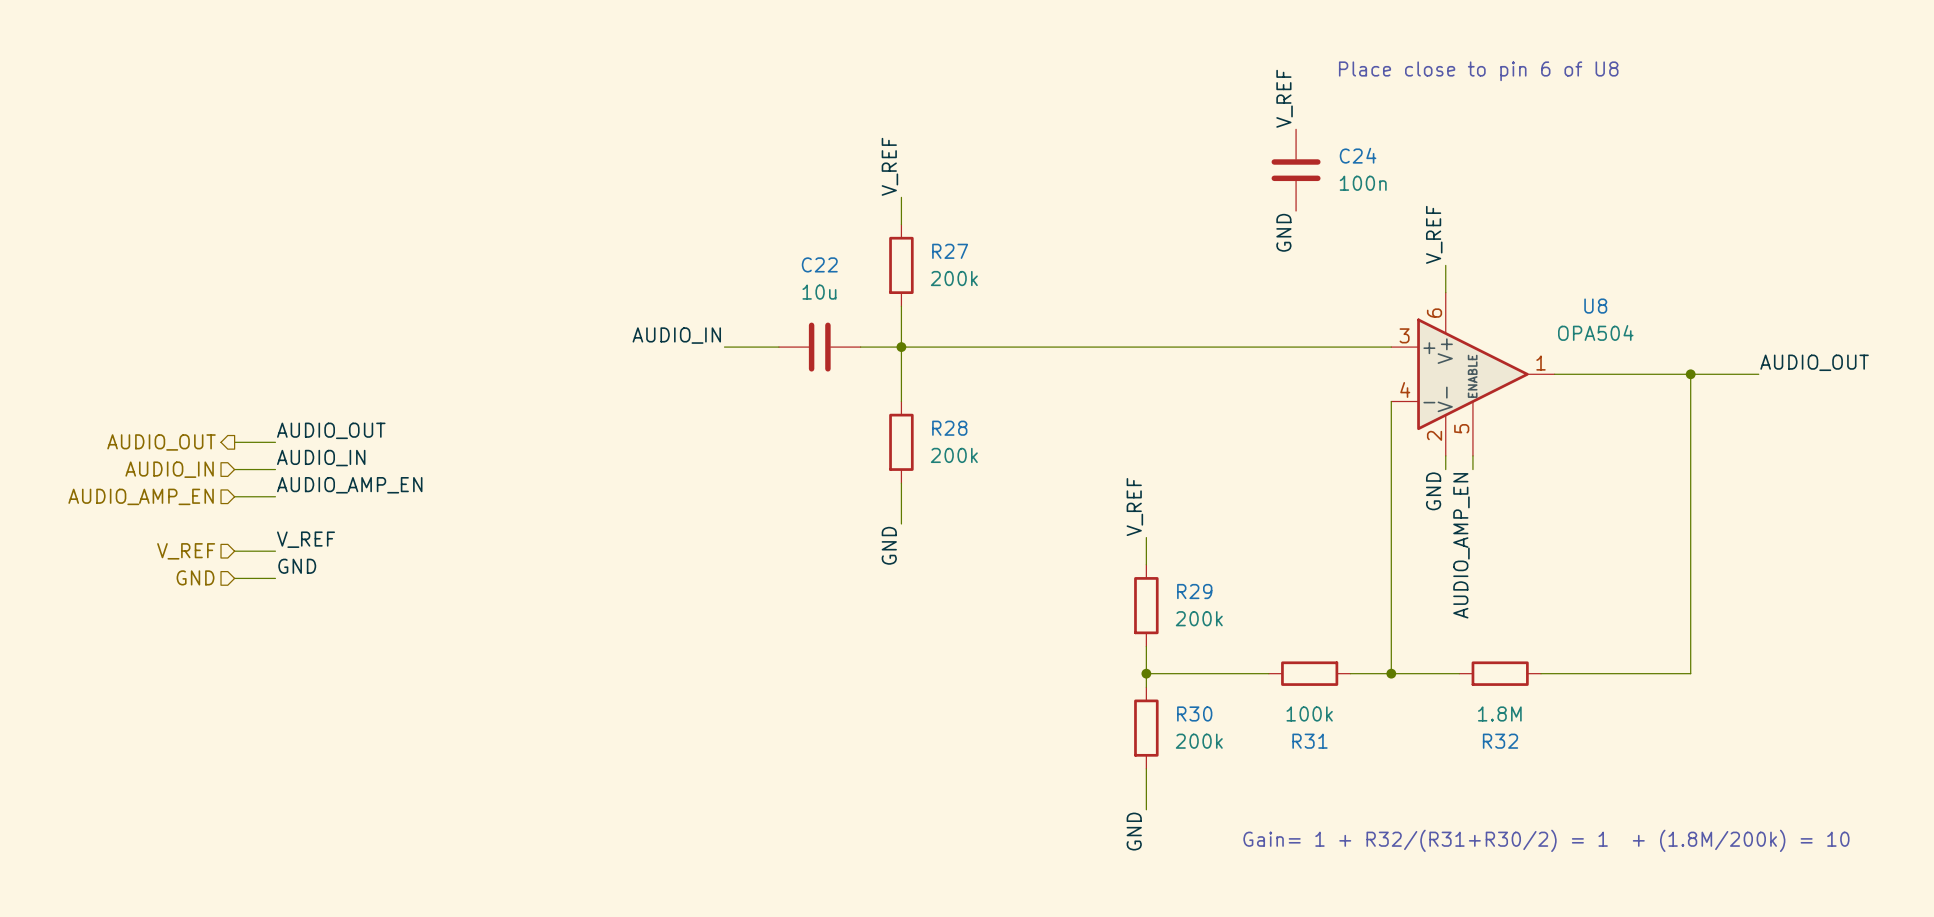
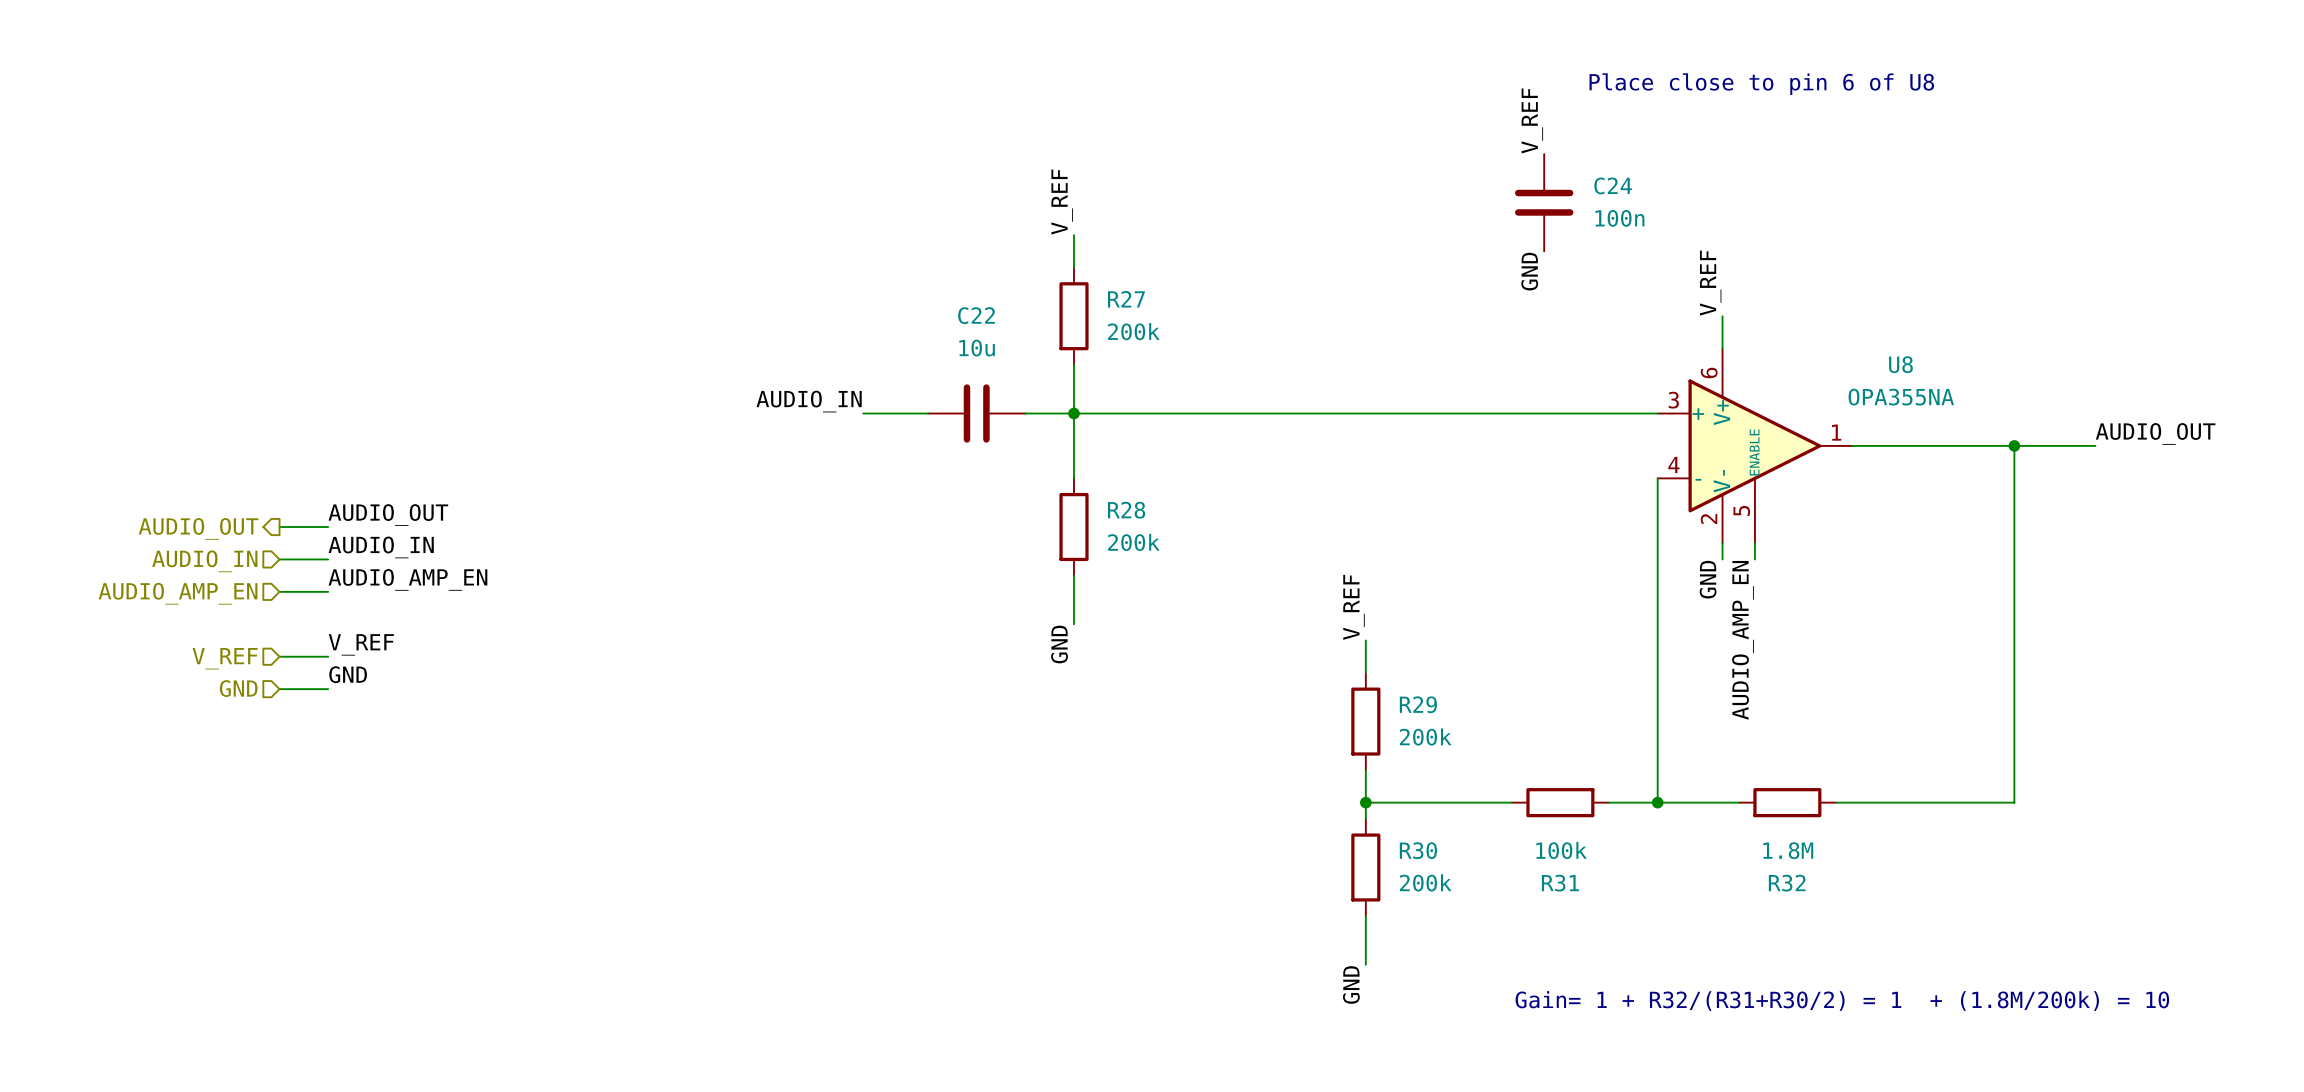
U8 value: OPA504 (1595, 332) -> OPA355NA (1901, 397)

